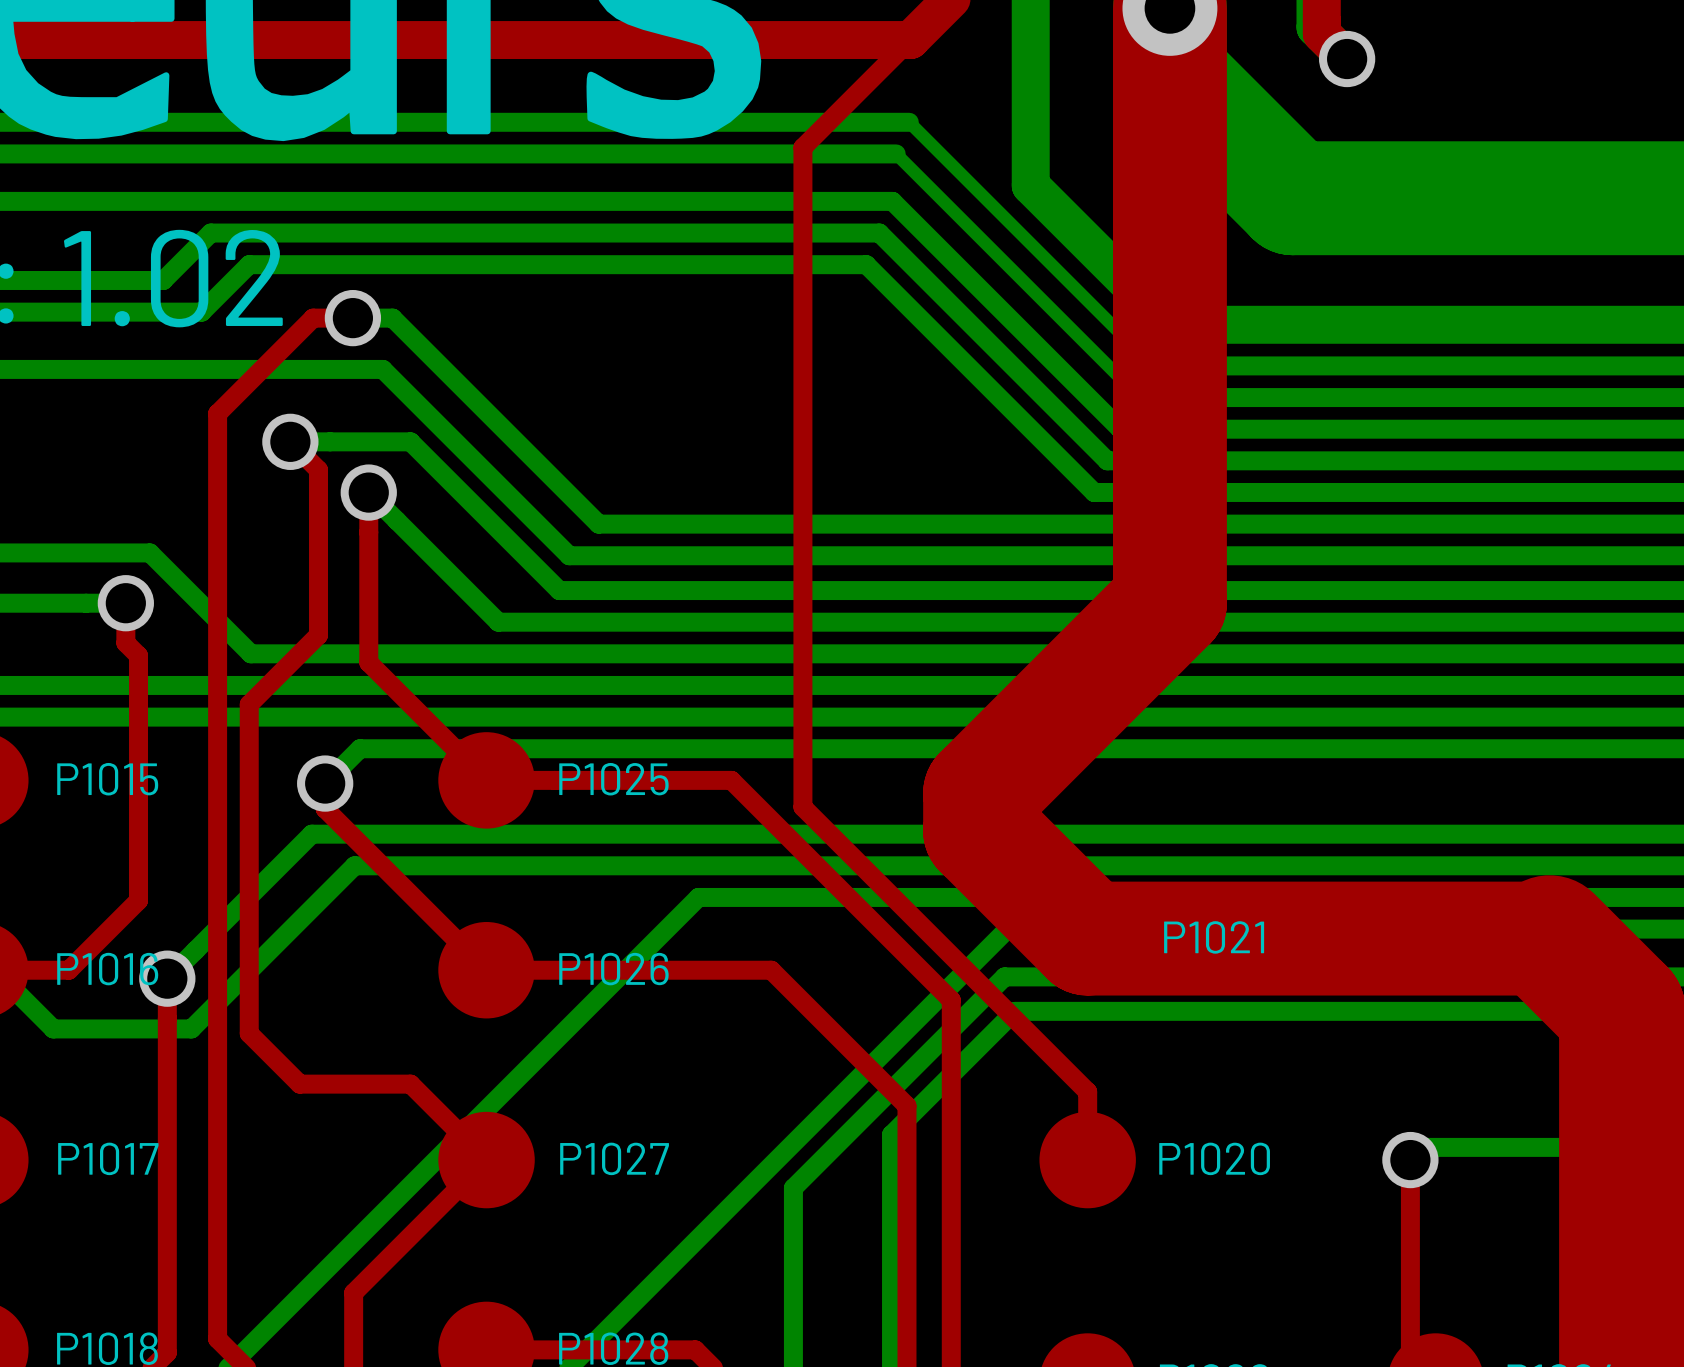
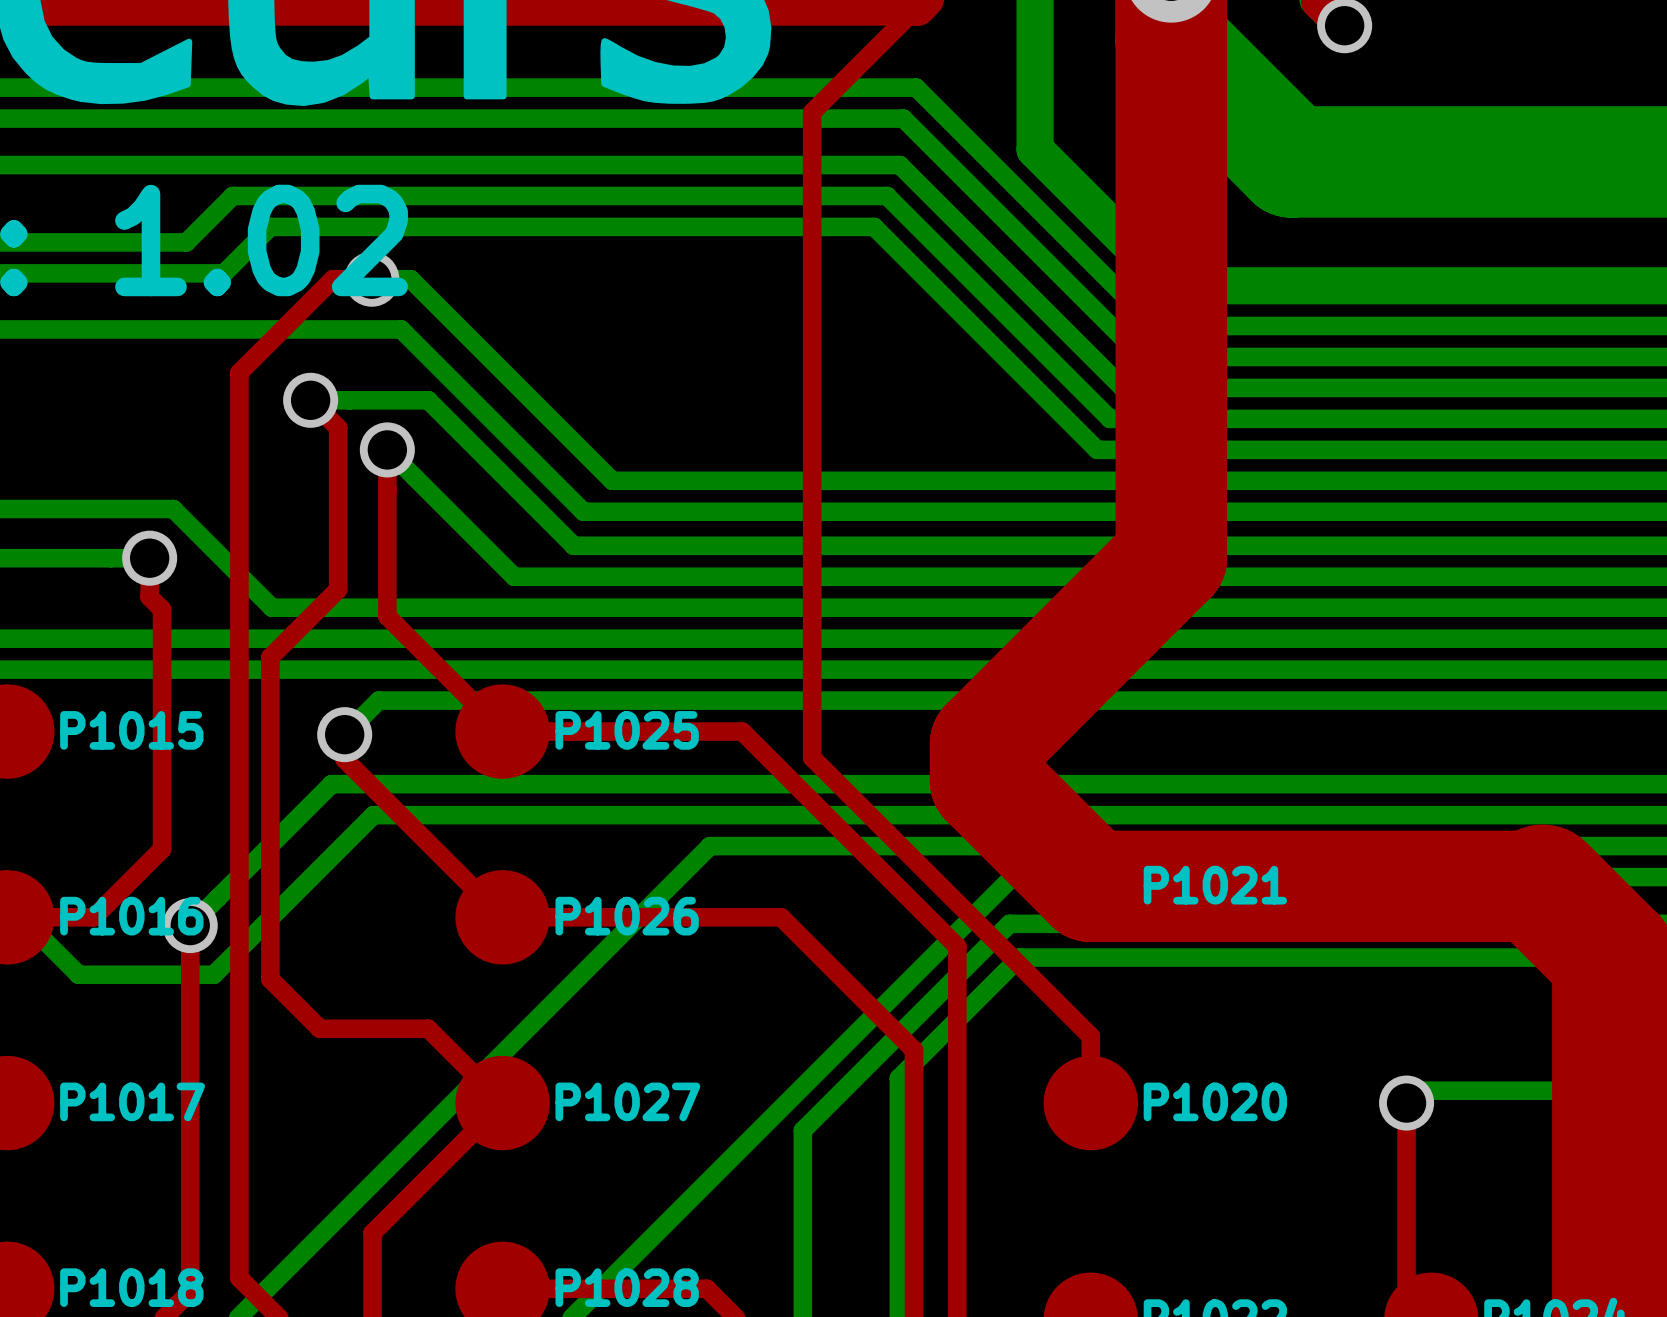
bottom track width: thin (909, 122) (1152, 365) -> thick (916, 87) (1154, 326)
bottom track width: thin (896, 153) (1139, 397) -> thick (903, 118) (1141, 356)

